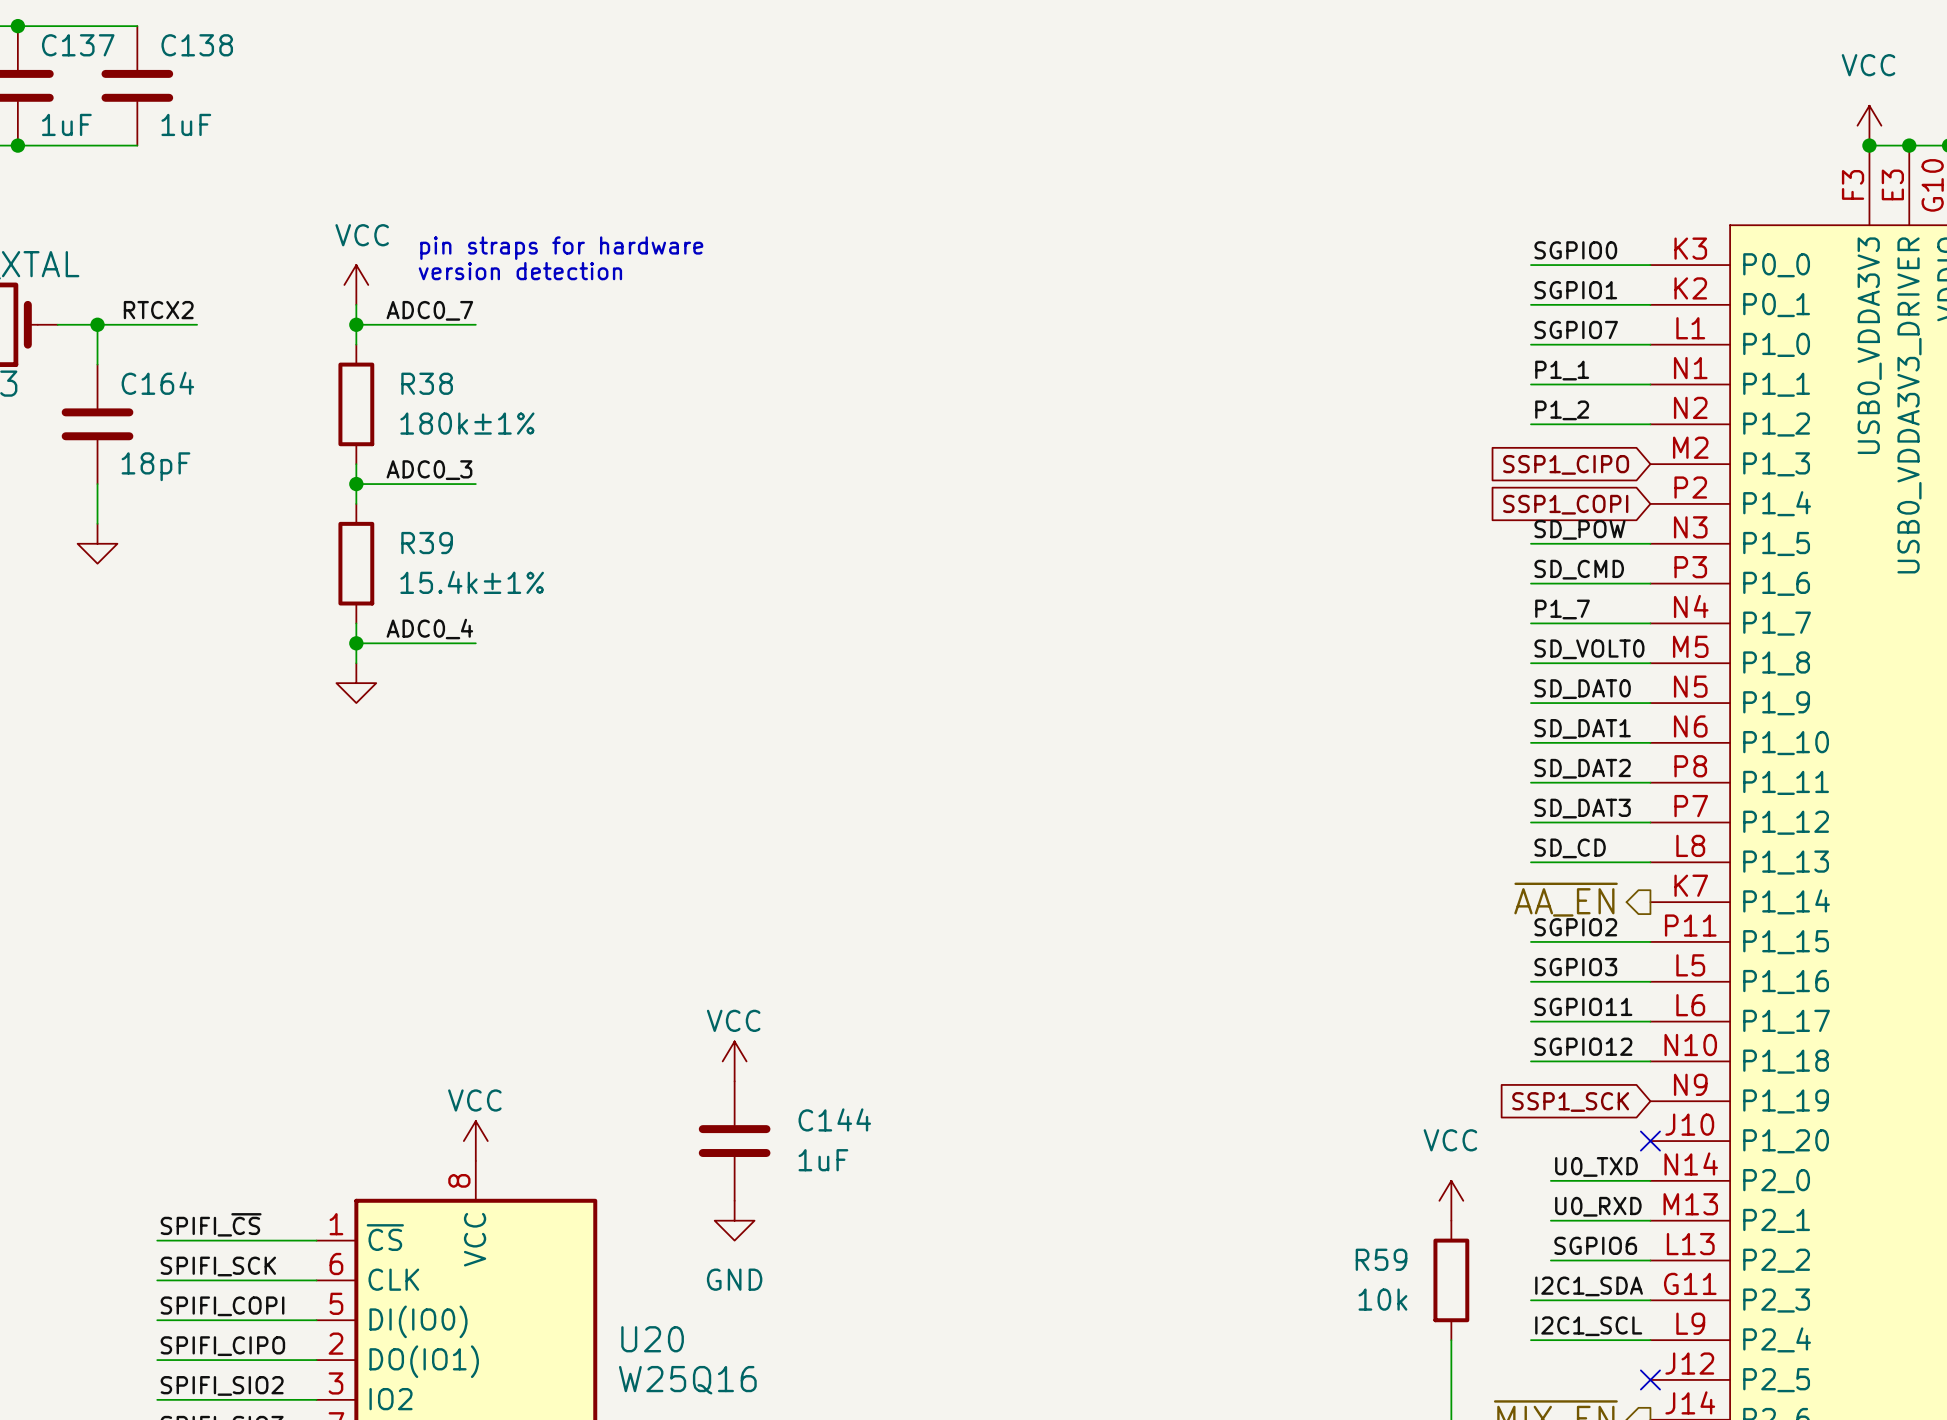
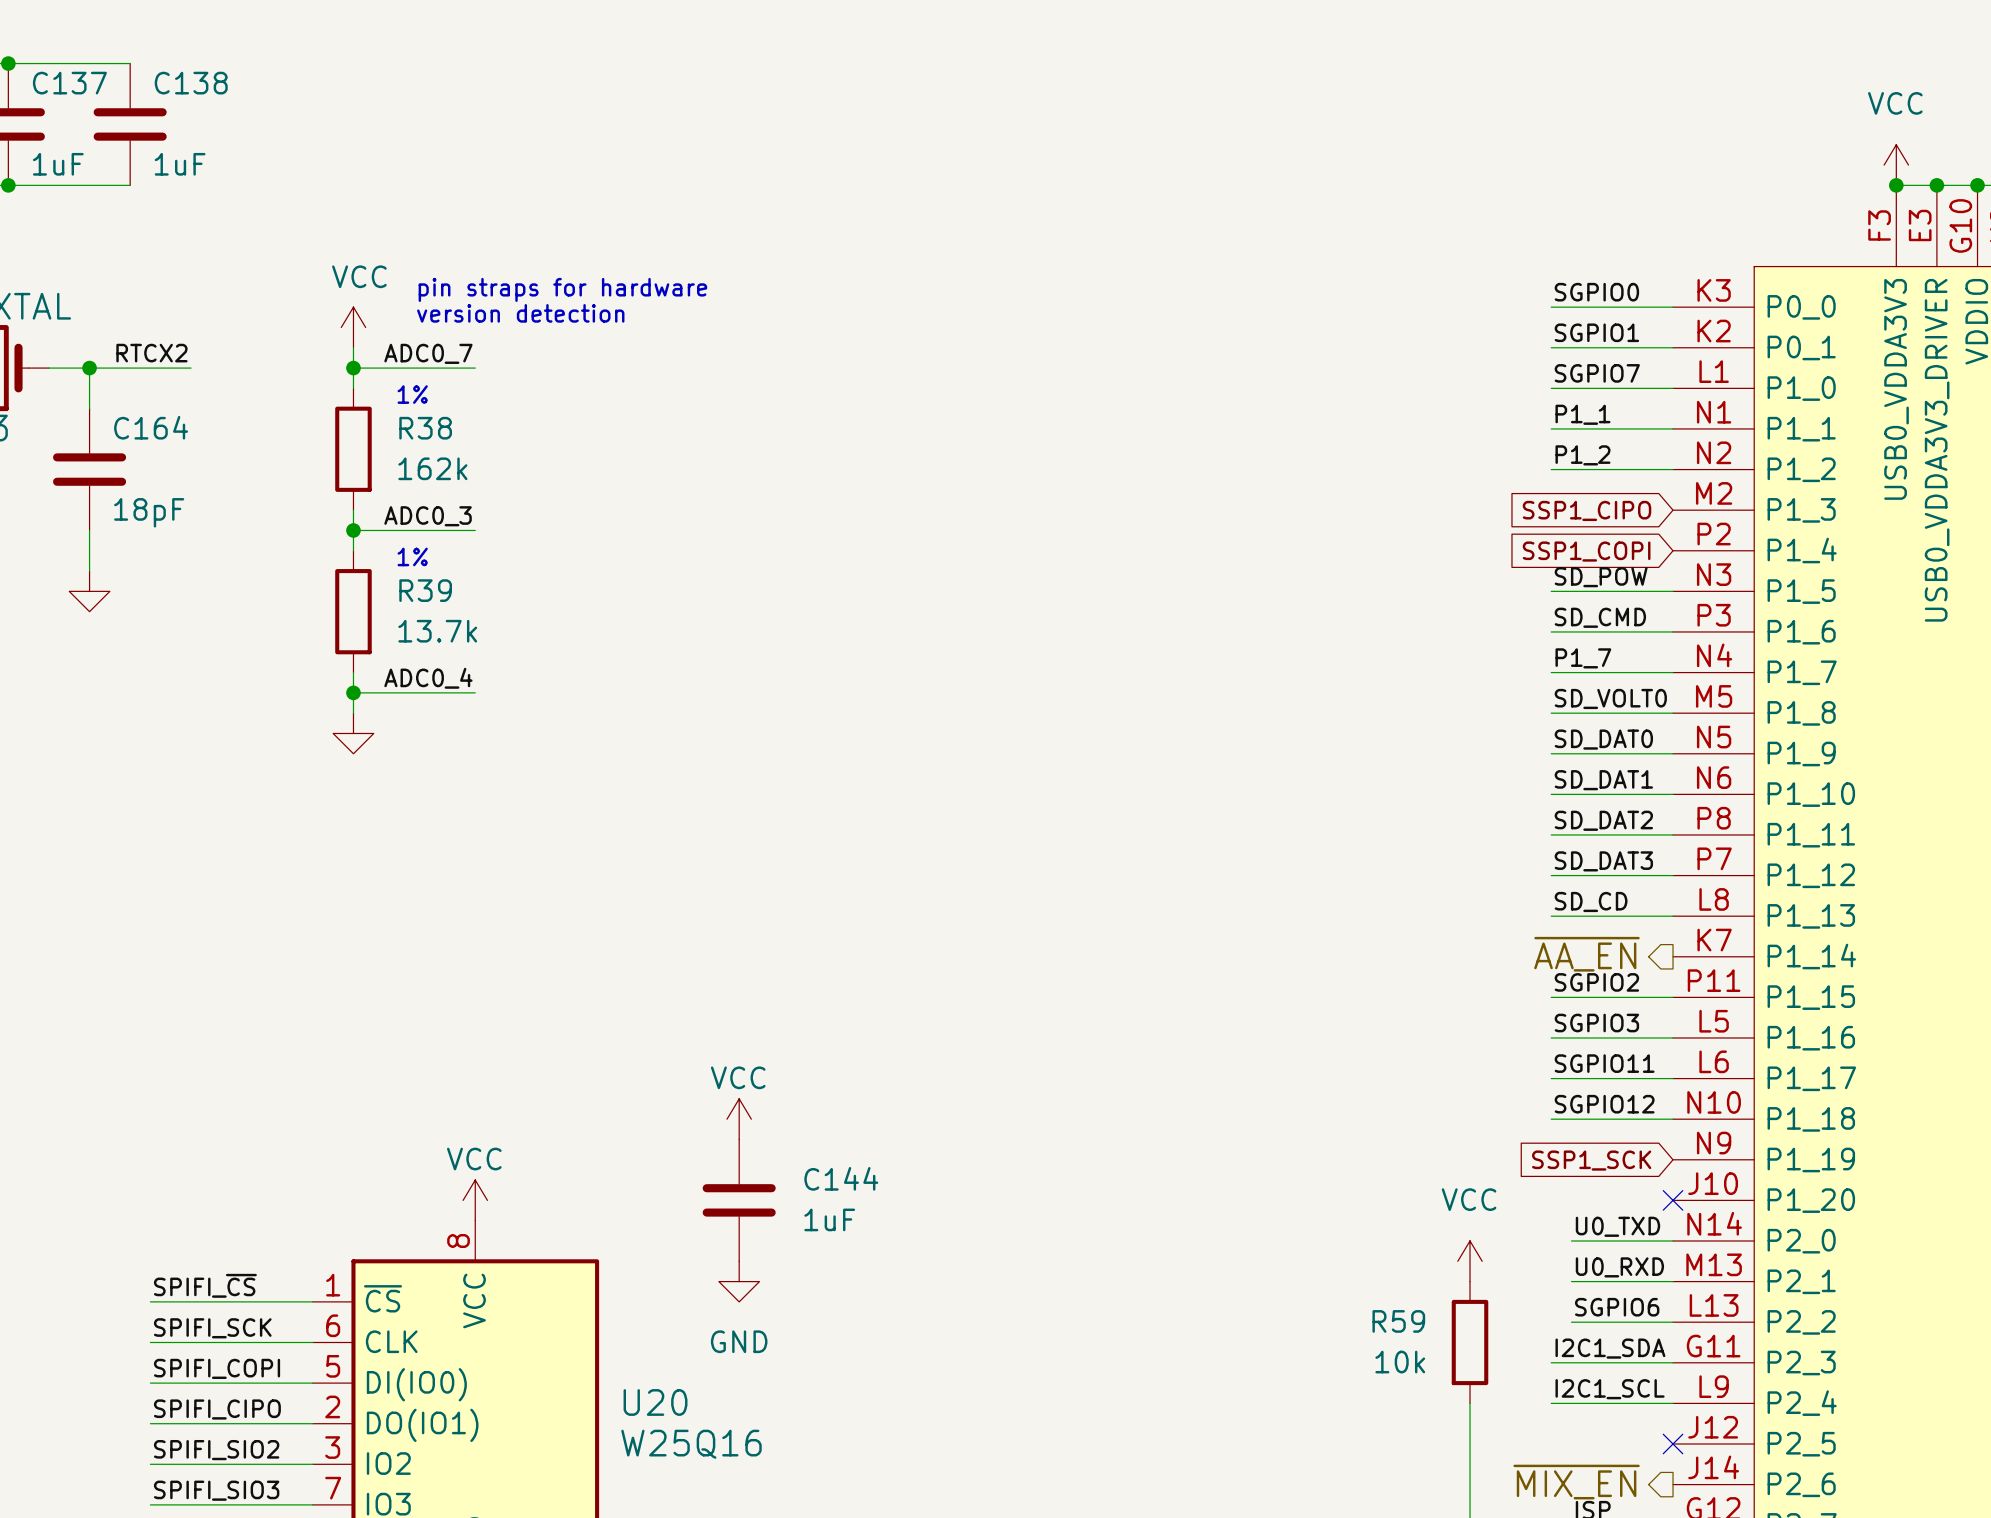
text: none -> 1% (412, 394)
R38 value: 180k±1% (467, 423) -> 162k (432, 468)
text: none -> 1% (412, 556)
R39 value: 15.4k±1% (472, 582) -> 13.7k (437, 631)

